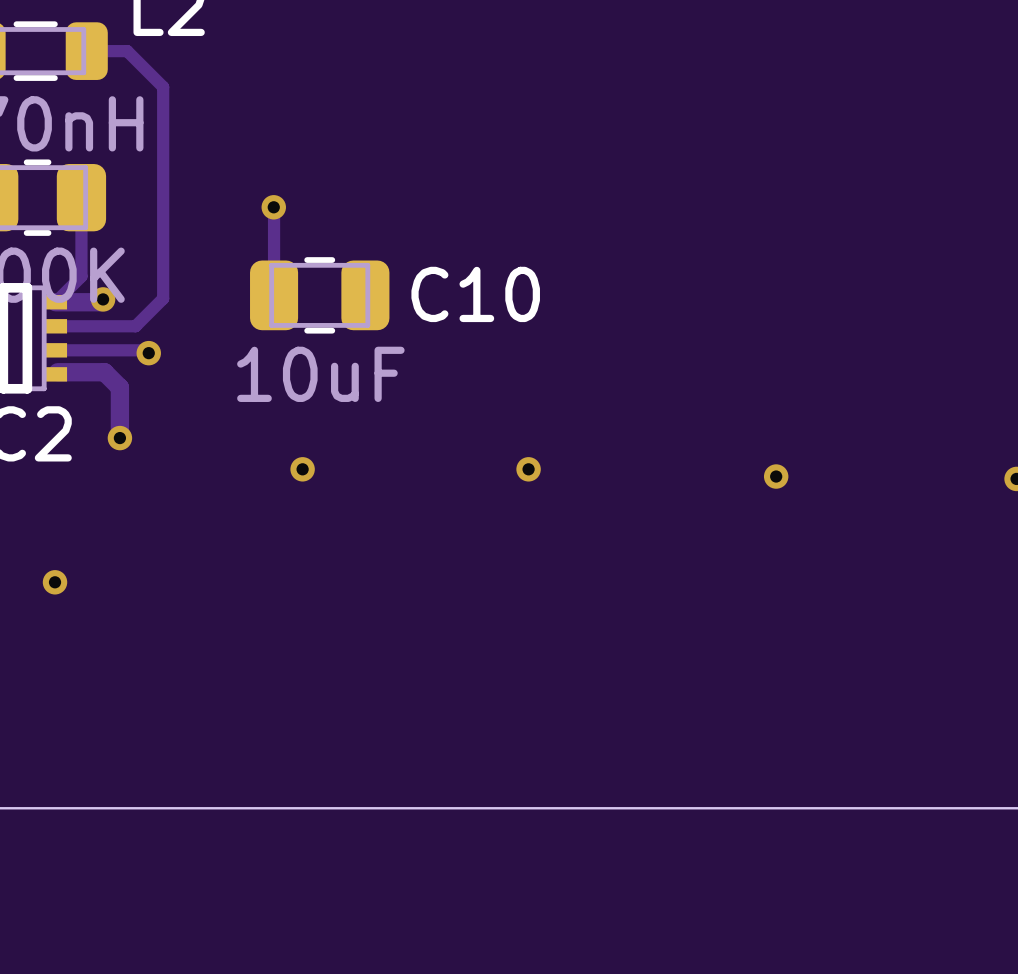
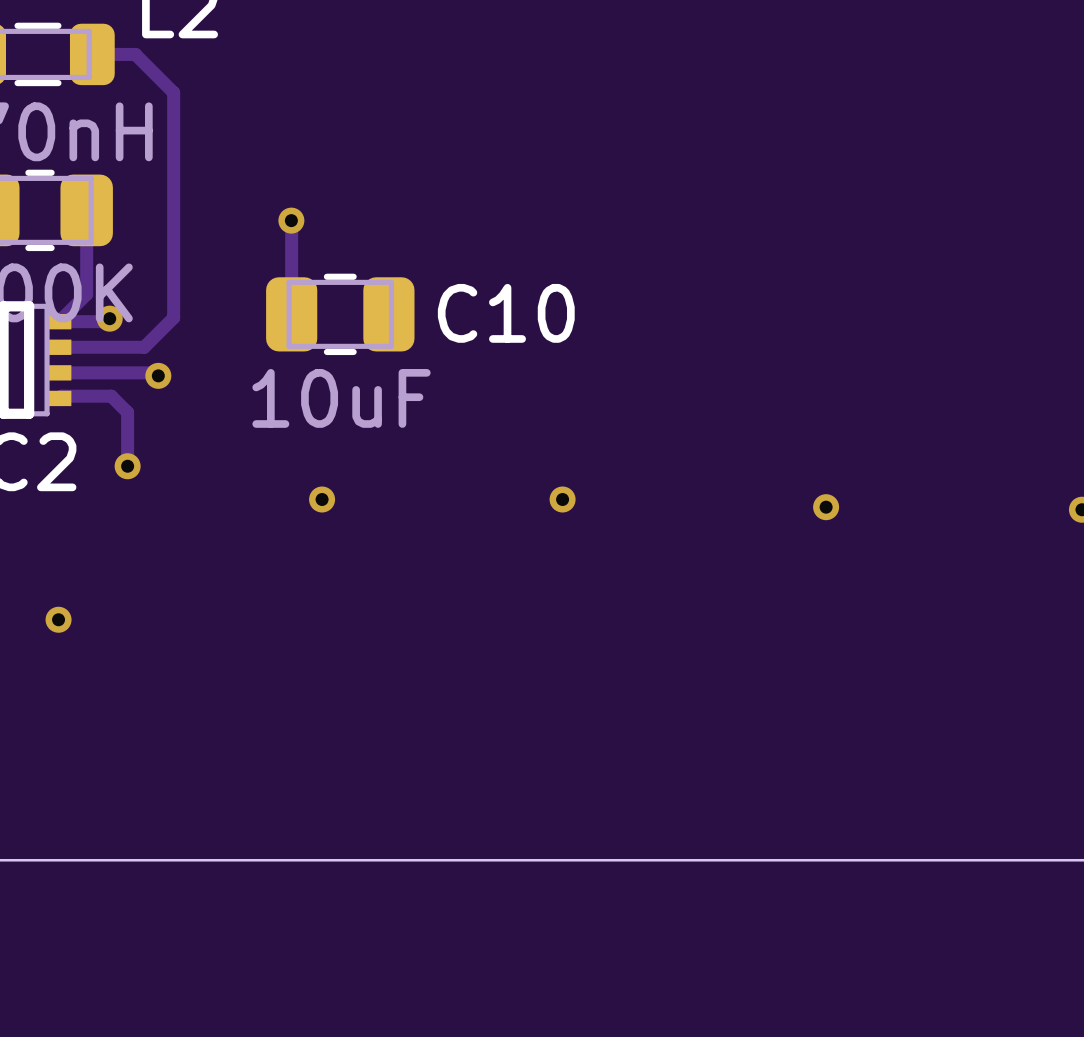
track width: thick (55, 302) (100, 302) -> thin (59, 321) (106, 321)
track width: thick (57, 372) (104, 372) (119, 387) (119, 438) -> thin (61, 396) (111, 396) (127, 412) (127, 466)

